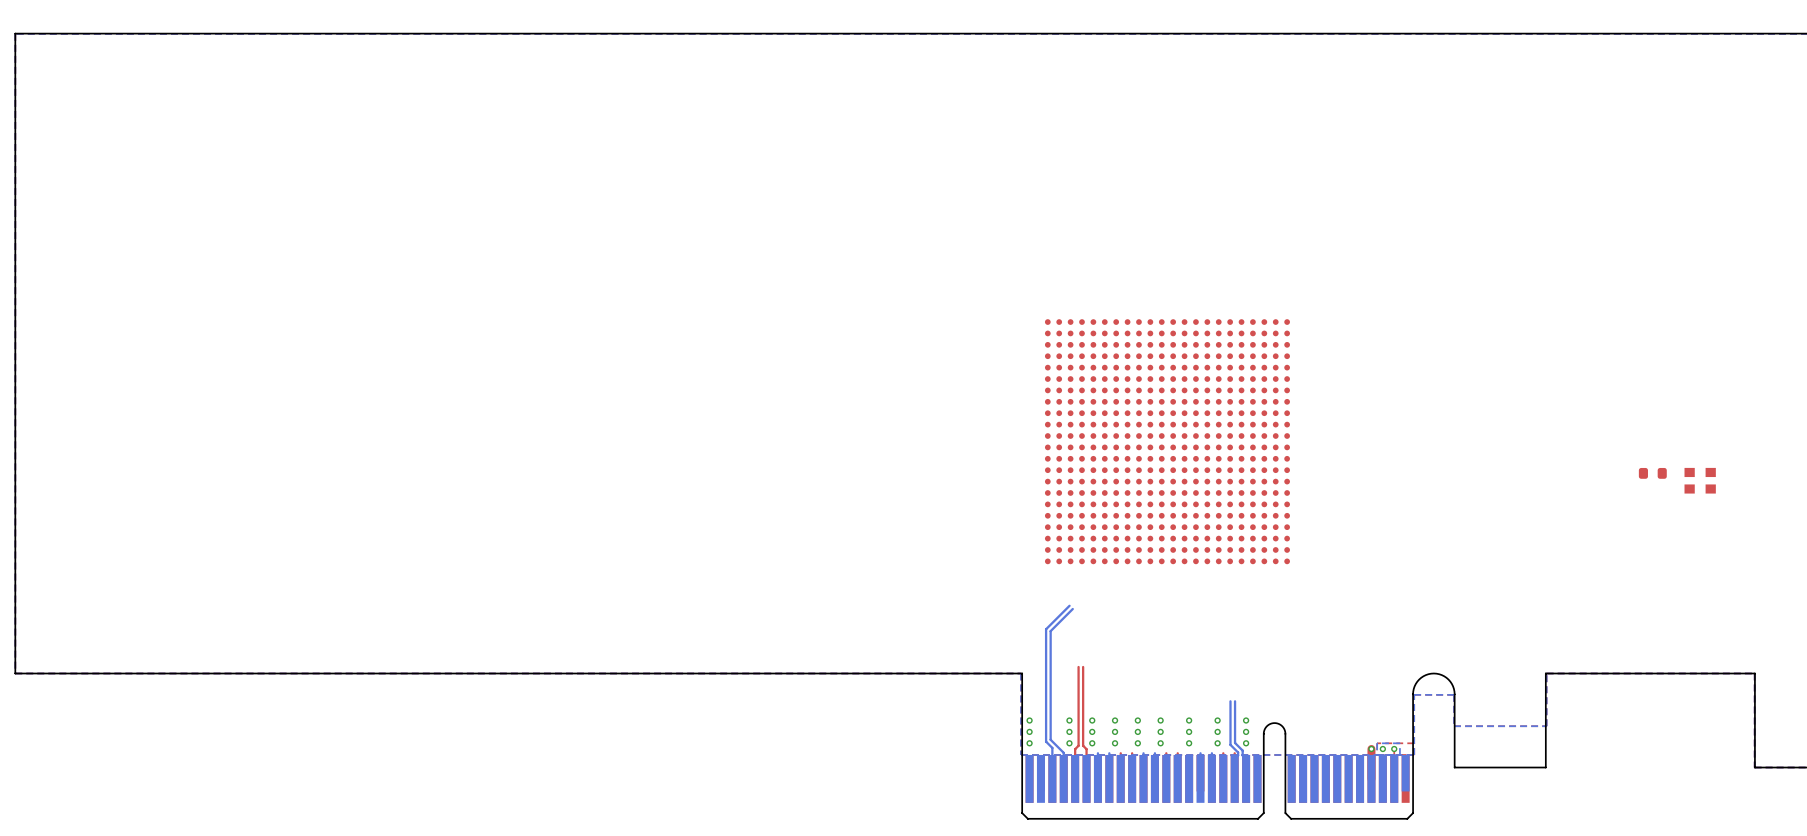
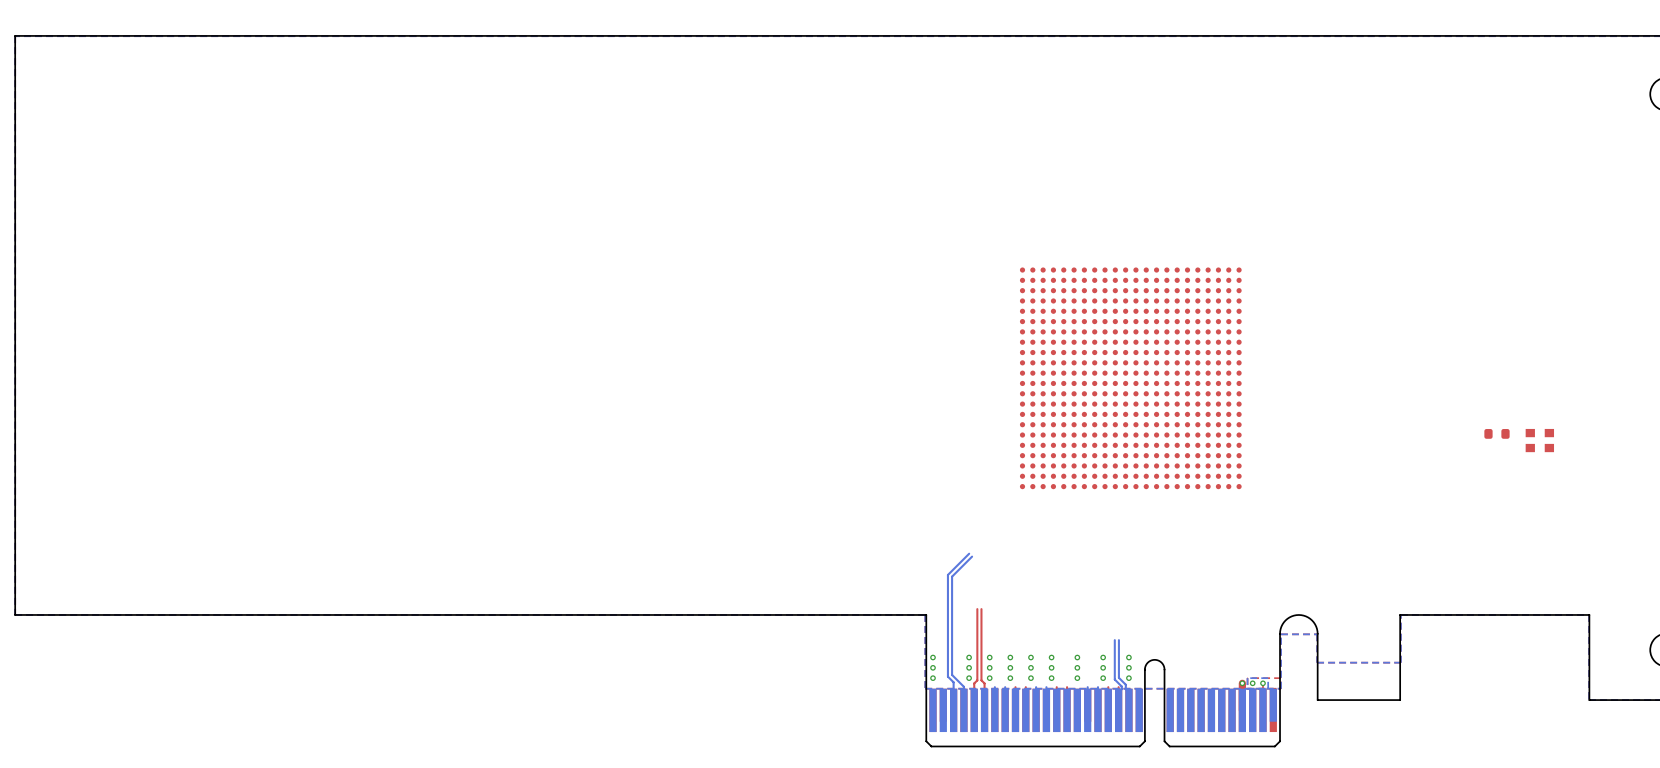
part position: (1167, 441) -> (1130, 378)

